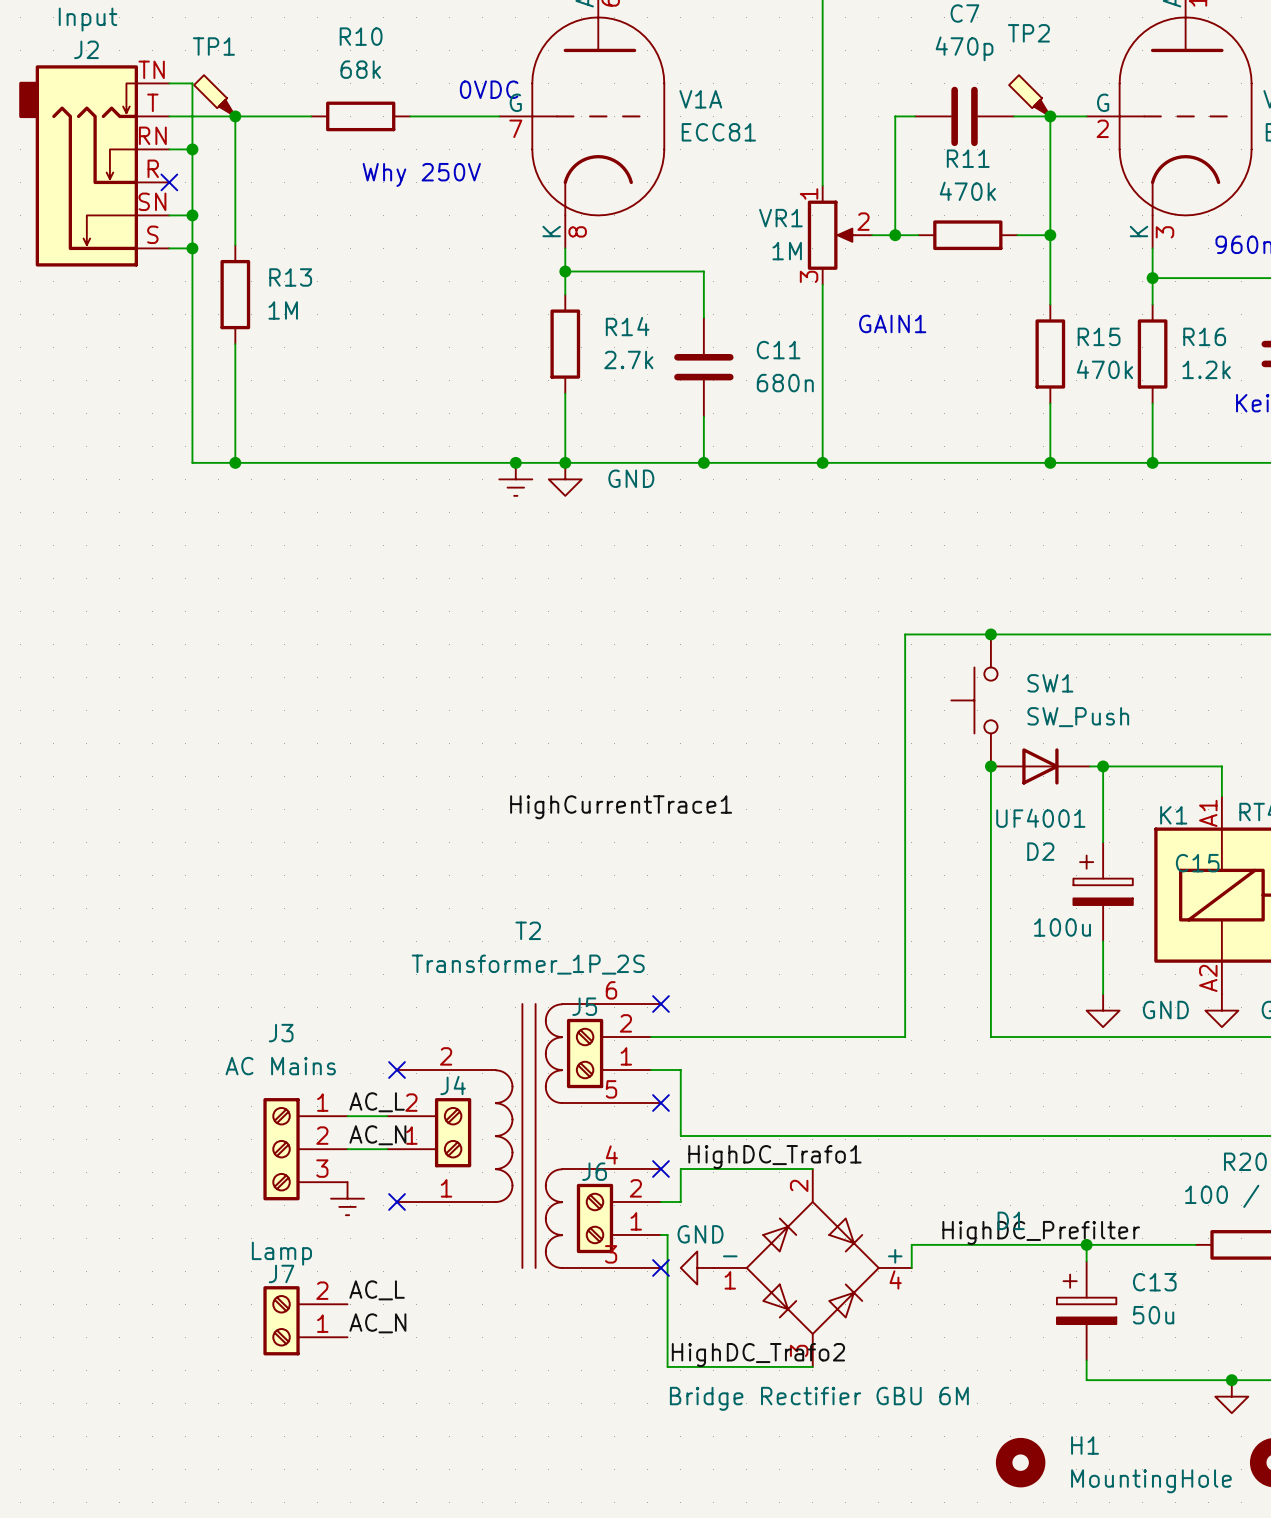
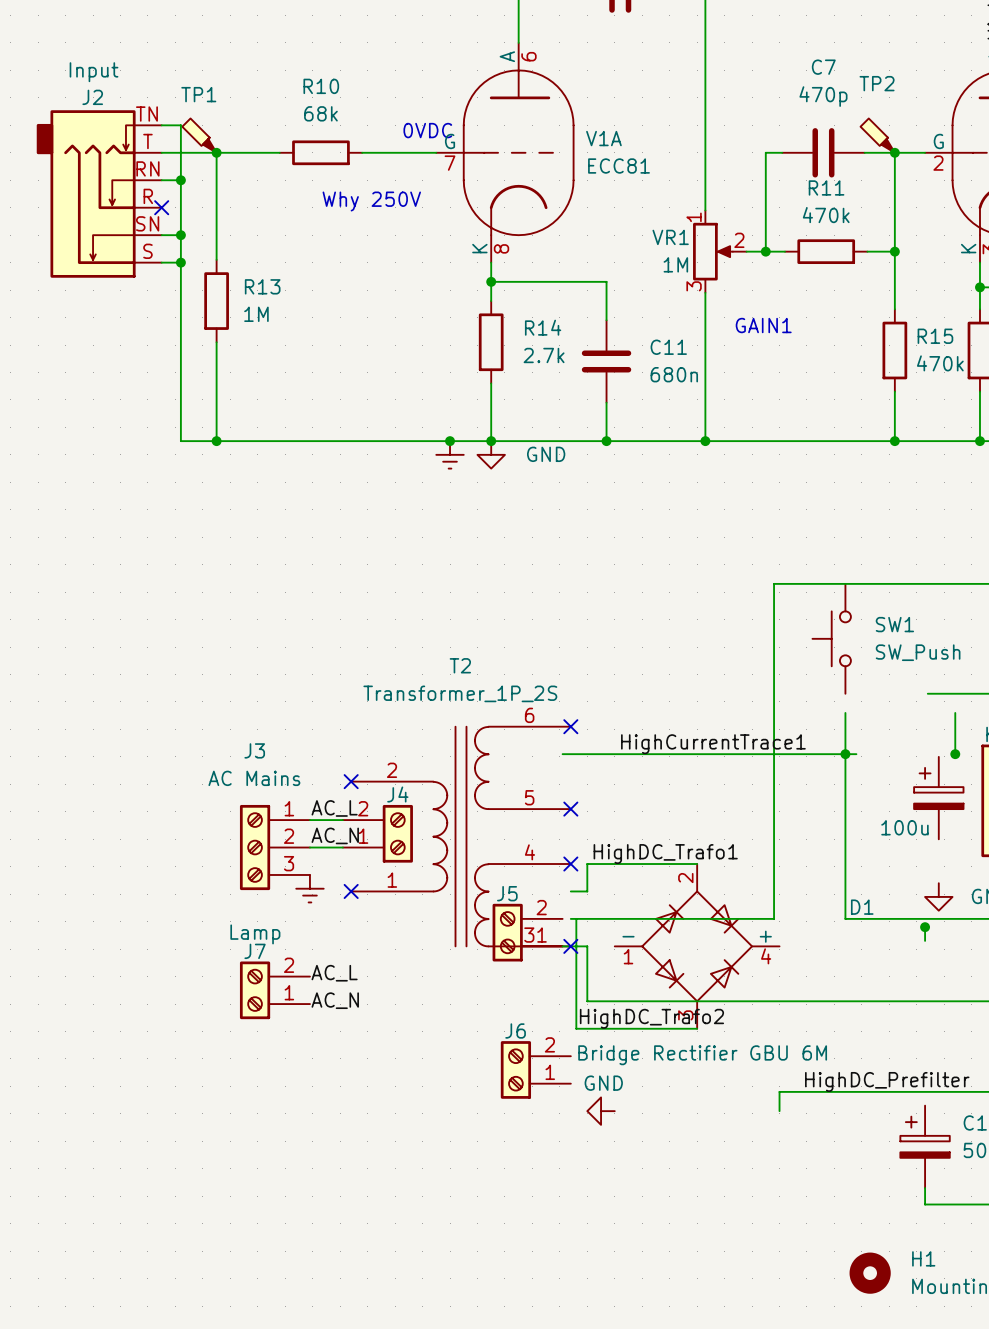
junction: (990, 634) -> none
wire: (990, 766) (990, 789) -> none
junction: (990, 766) -> none
D2: UF4001 (1040, 766) -> none
wire: (1103, 766) (1103, 842) -> none
junction: (1103, 766) -> none
wire: none -> (955, 712) (955, 754)
no-connect mark: none -> (570, 726)
label position: HighCurrentTrace1 (621, 807) -> HighCurrentTrace1 (713, 744)
wire: none -> (562, 754) (856, 754)
junction: none -> (845, 754)
junction: none -> (955, 754)
no-connect mark: none -> (351, 781)
label: none -> AC_L (334, 808)
no-connect mark: none -> (570, 809)
label: none -> AC_N (335, 835)
wire: (1103, 941) (1103, 994) -> none
no-connect mark: none -> (570, 864)
wire: none -> (697, 864) (587, 864) (587, 891) (570, 891)
no-connect mark: (660, 1004) -> none
wire: (651, 1037) (660, 1037) -> none
junction: none -> (925, 927)
no-connect mark position: (397, 1070) -> (351, 891)
no-connect mark: none -> (570, 946)
no-connect mark: (660, 1103) -> none
wire: (347, 1116) (387, 1116) -> (309, 820) (342, 820)
J4 position: (429, 1132) -> (377, 833)
T2 position: (528, 1135) -> (461, 836)
J3 position: (305, 1149) -> (274, 847)
wire: (347, 1149) (387, 1149) -> (309, 847) (342, 847)
label position: HighDC_Trafo1 (774, 1157) -> HighDC_Trafo1 (665, 854)
no-connect mark: (660, 1168) -> none
wire: (680, 1168) (680, 1201) (660, 1201) -> (587, 1028) (576, 1028) (576, 918)
power symbol position: (347, 1198) -> (309, 888)
no-connect mark: (397, 1201) -> none
wire: (660, 1234) (667, 1234) (667, 1366) (812, 1366) -> none
wire: (1086, 1244) (1086, 1261) -> (925, 927) (925, 940)
junction: (1086, 1244) -> none
no-connect mark: (660, 1267) -> none
D1 position: (812, 1267) -> (697, 946)
label: AC_L (377, 1290) -> none
J7 position: (305, 1320) -> (274, 990)
label: AC_N (377, 1323) -> none
label position: HighDC_Trafo2 (758, 1354) -> HighDC_Trafo2 (651, 1018)

